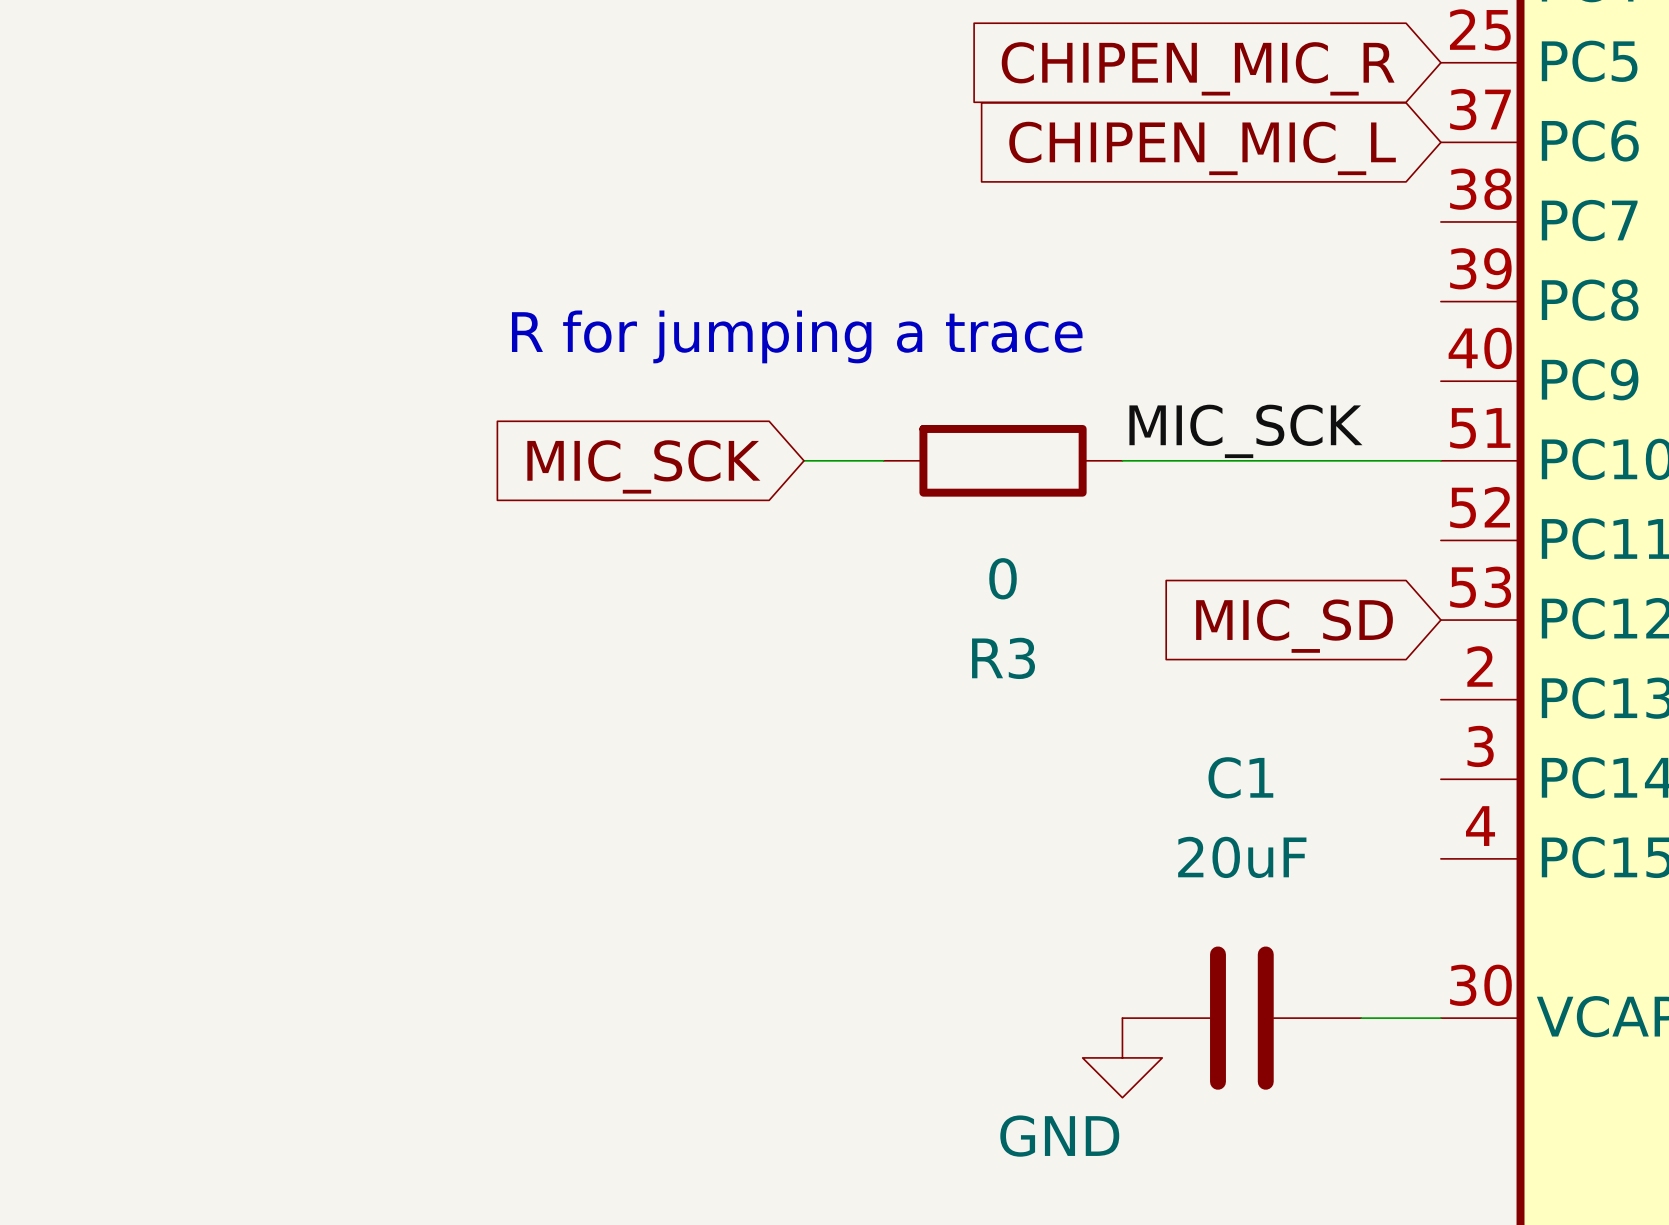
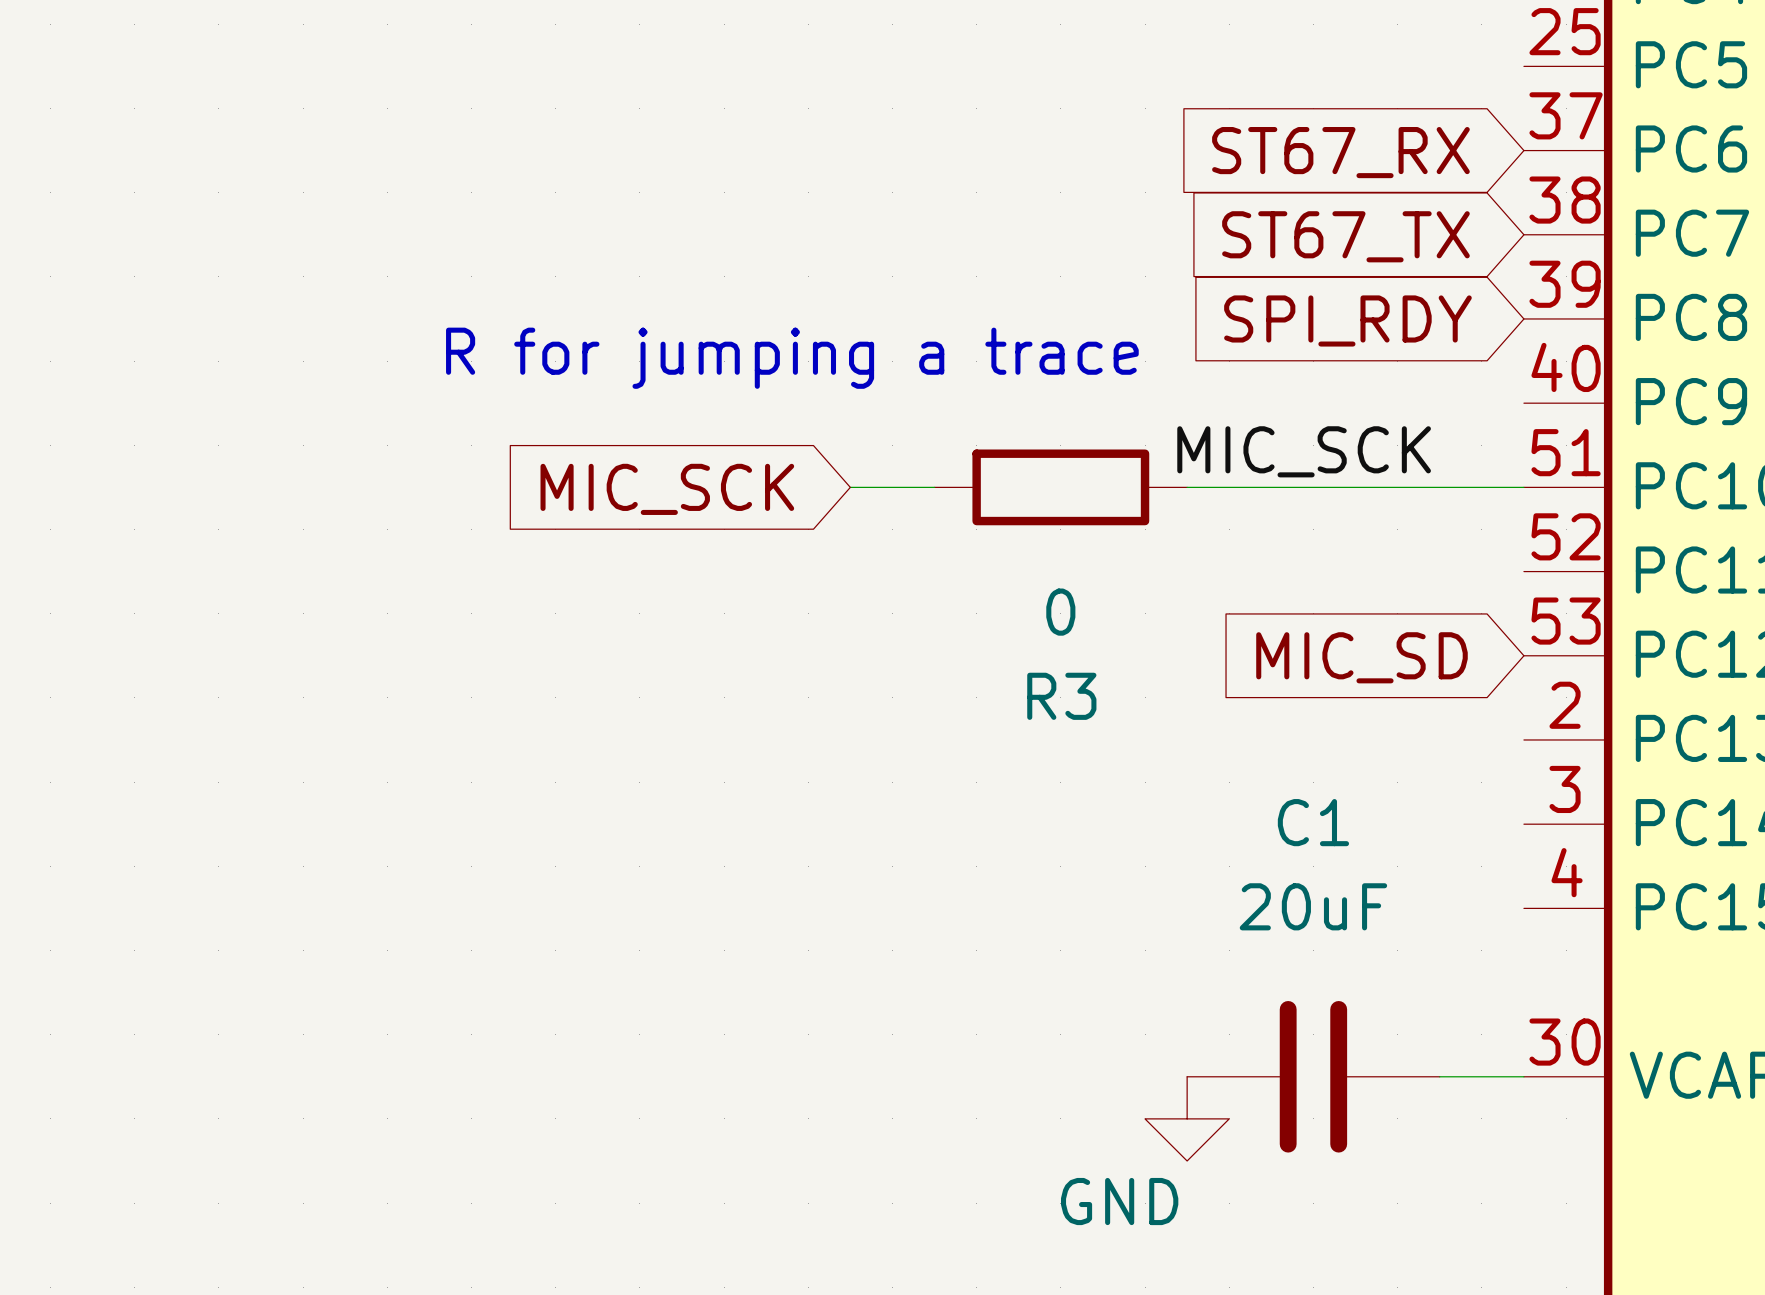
global label: CHIPEN_MIC_R (1198, 68) -> none
global label: CHIPEN_MIC_L (1202, 148) -> ST67_RX (1340, 152)
global label: none -> ST67_TX (1345, 236)
global label: none -> SPI_RDY (1347, 320)
text position: R for jumping a trace (797, 336) -> R for jumping a trace (792, 358)

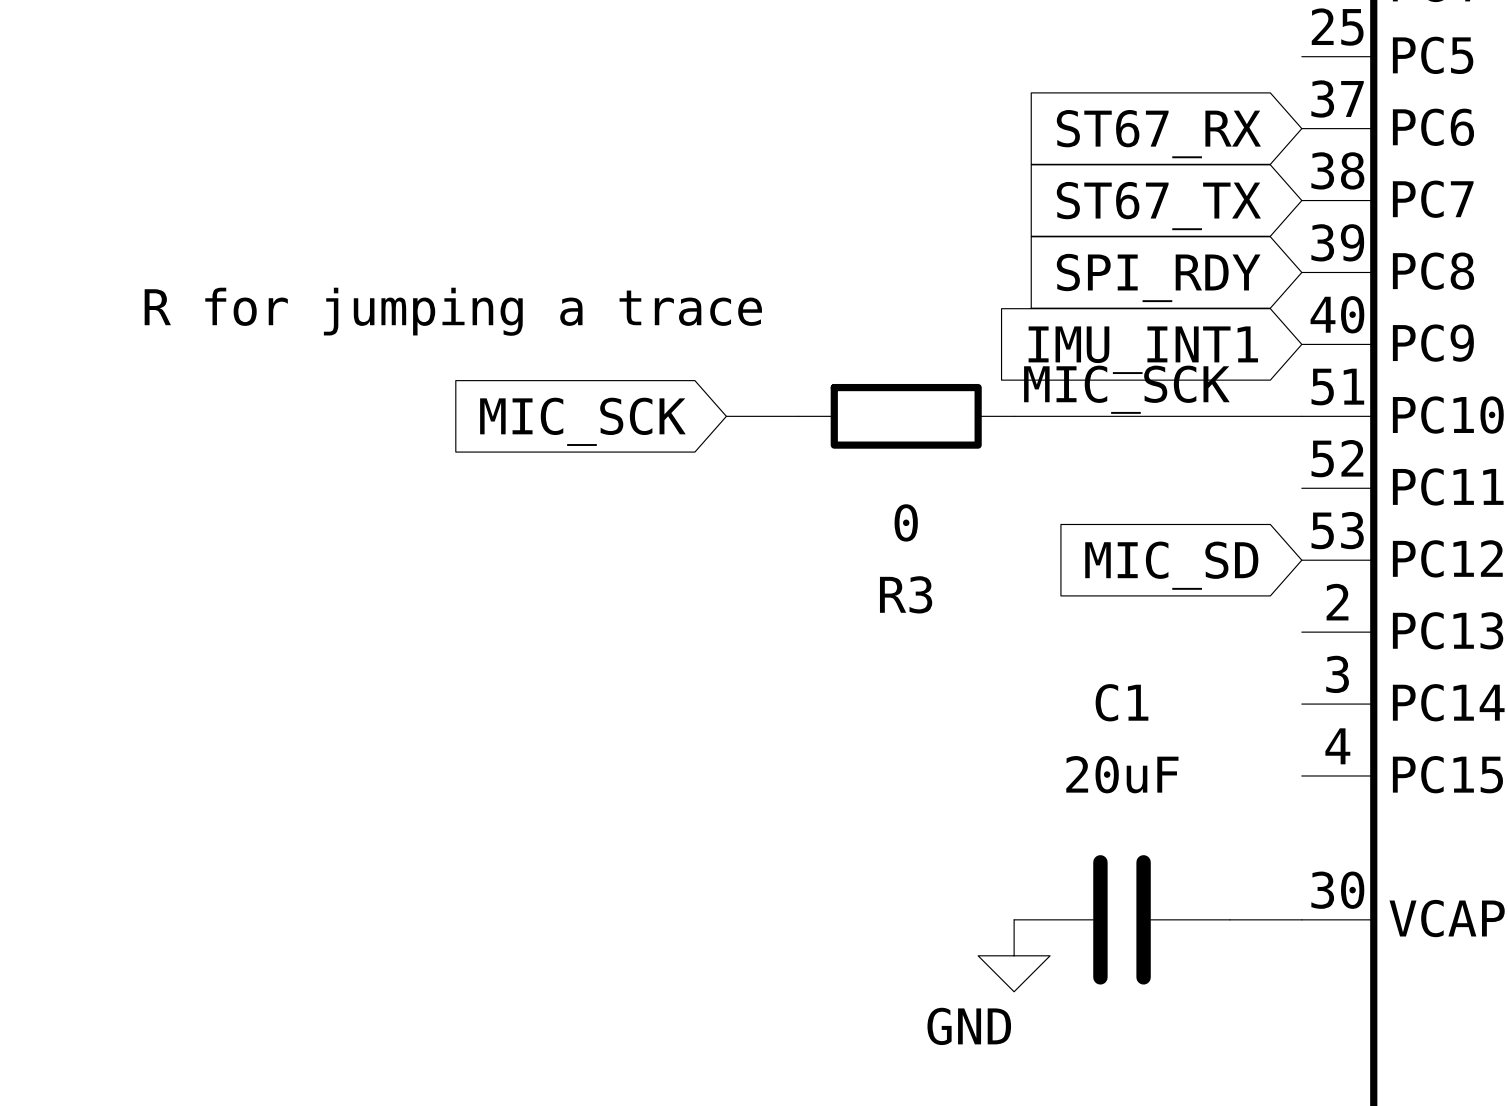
text position: R for jumping a trace (792, 358) -> R for jumping a trace (453, 311)
global label: none -> IMU_INT1 (1143, 350)

